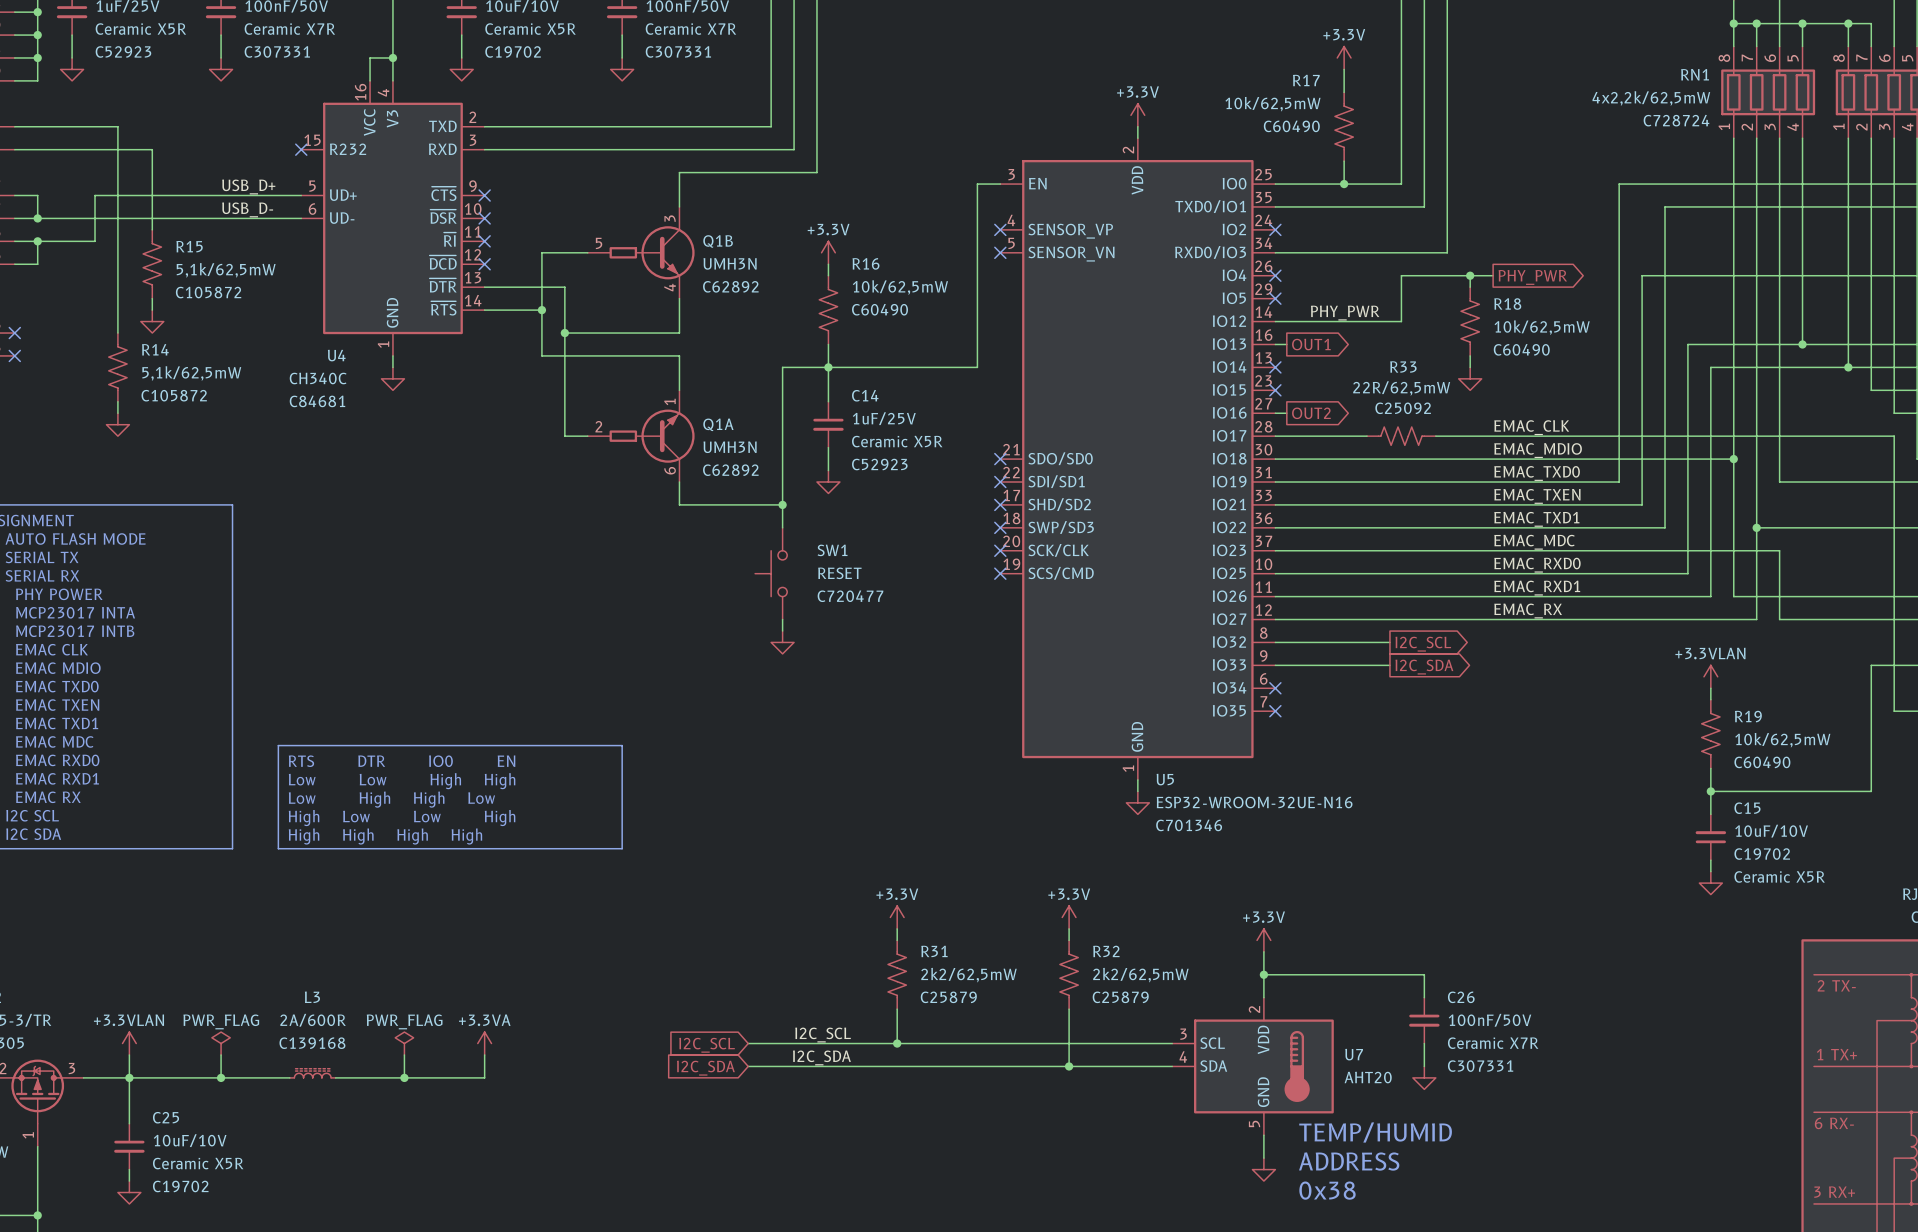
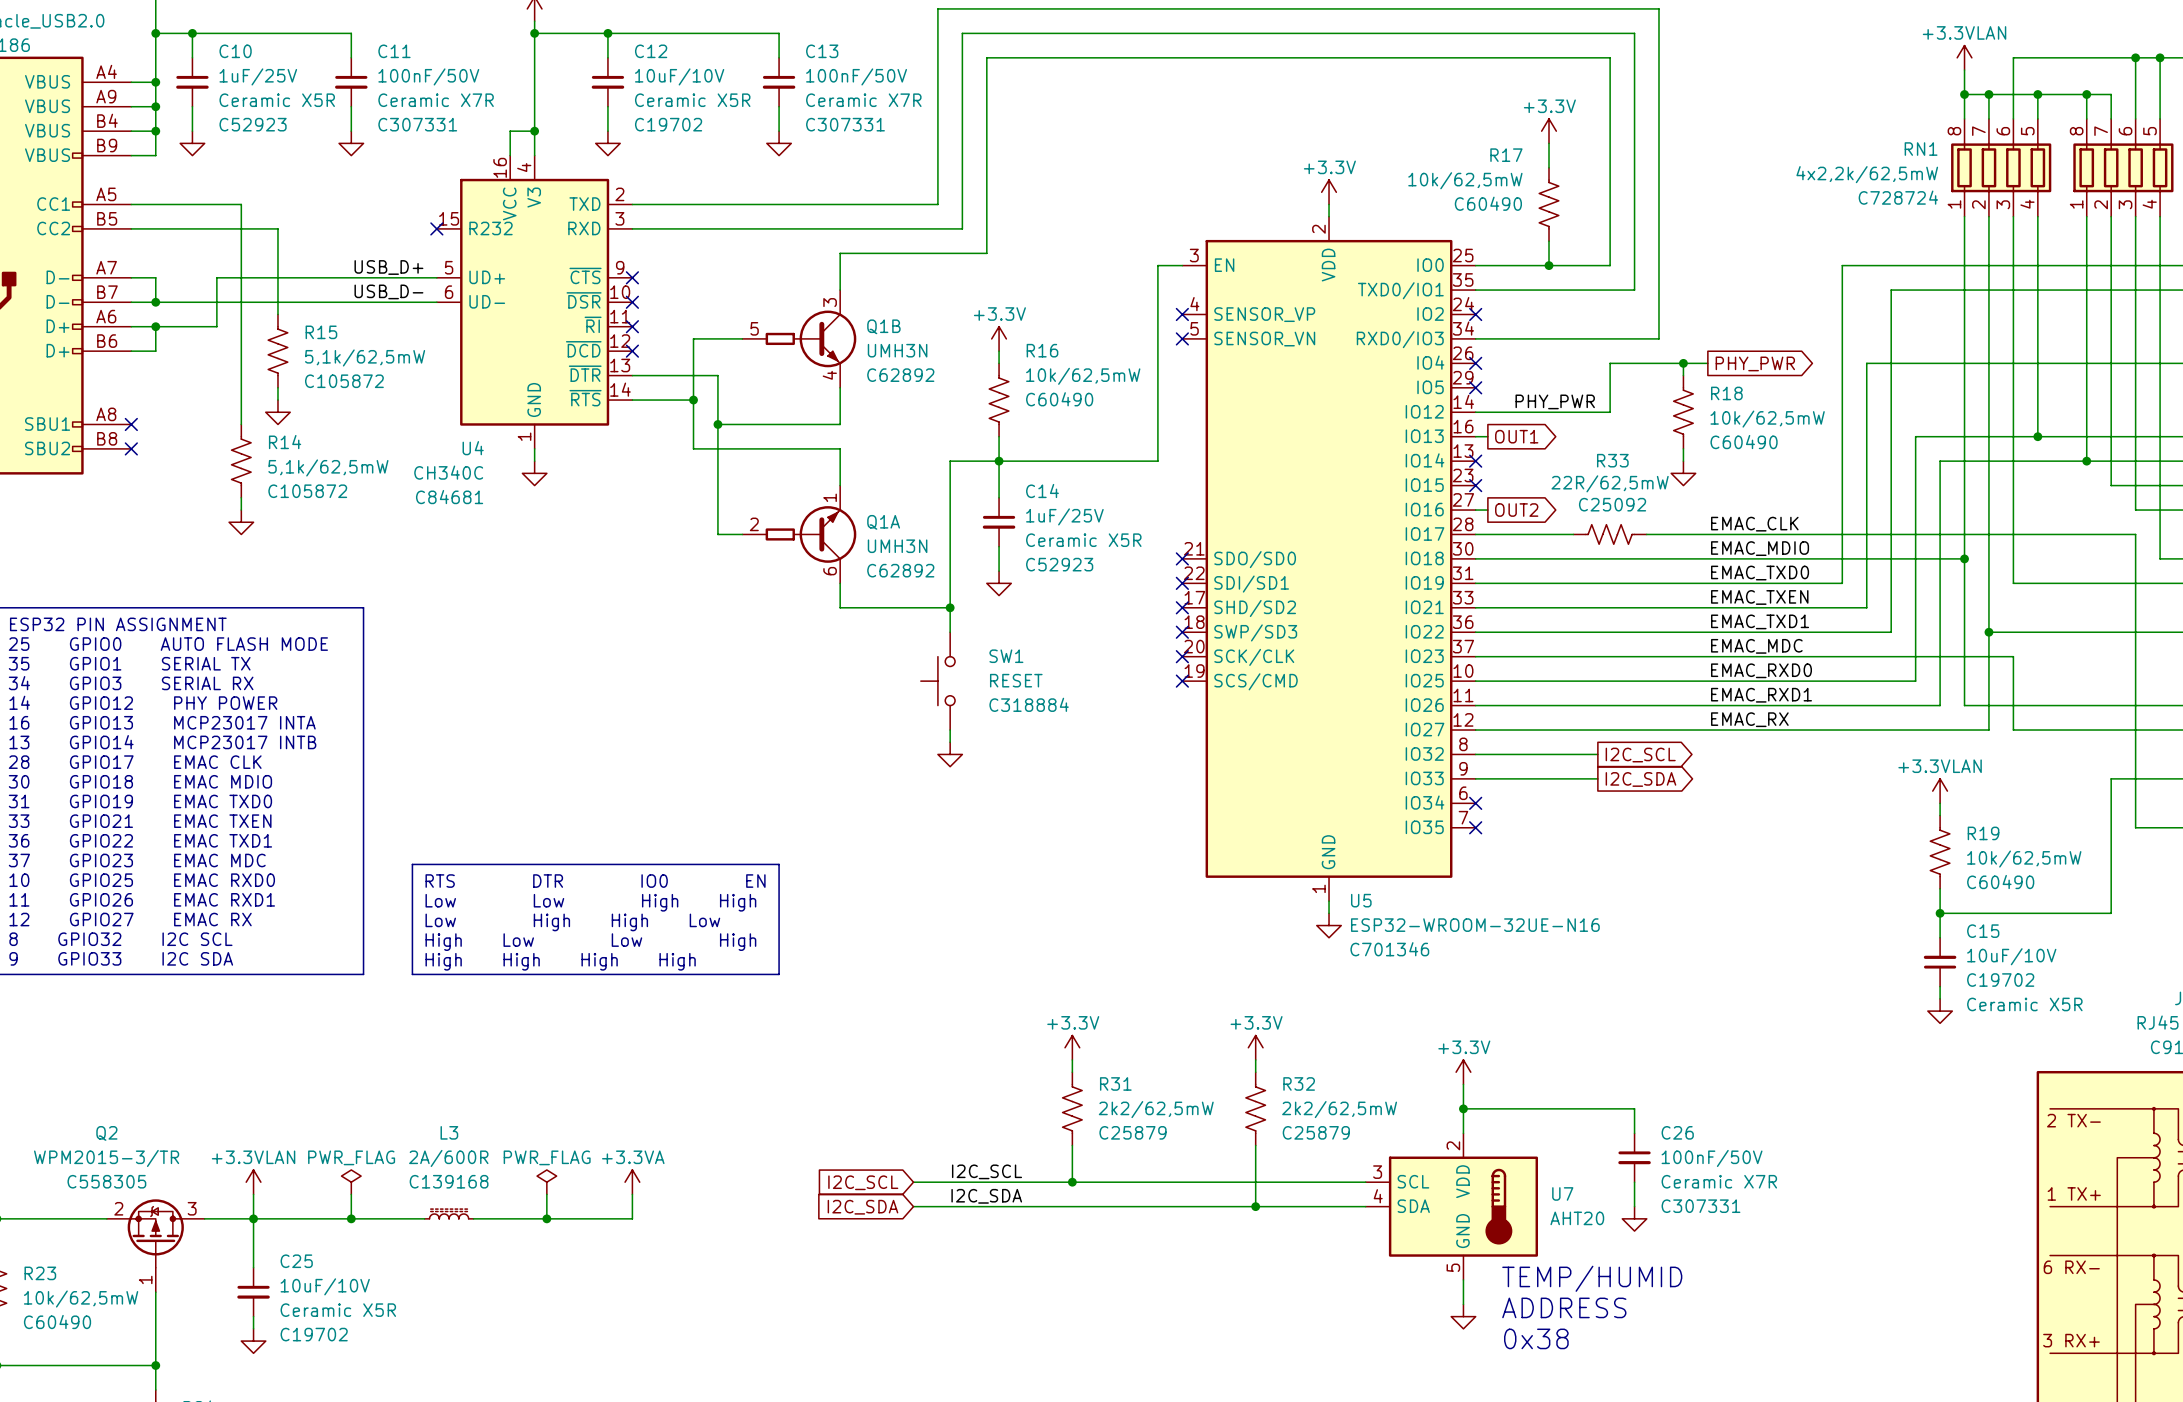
SW1 text: C720477 (850, 596) -> C318884 (1029, 704)

